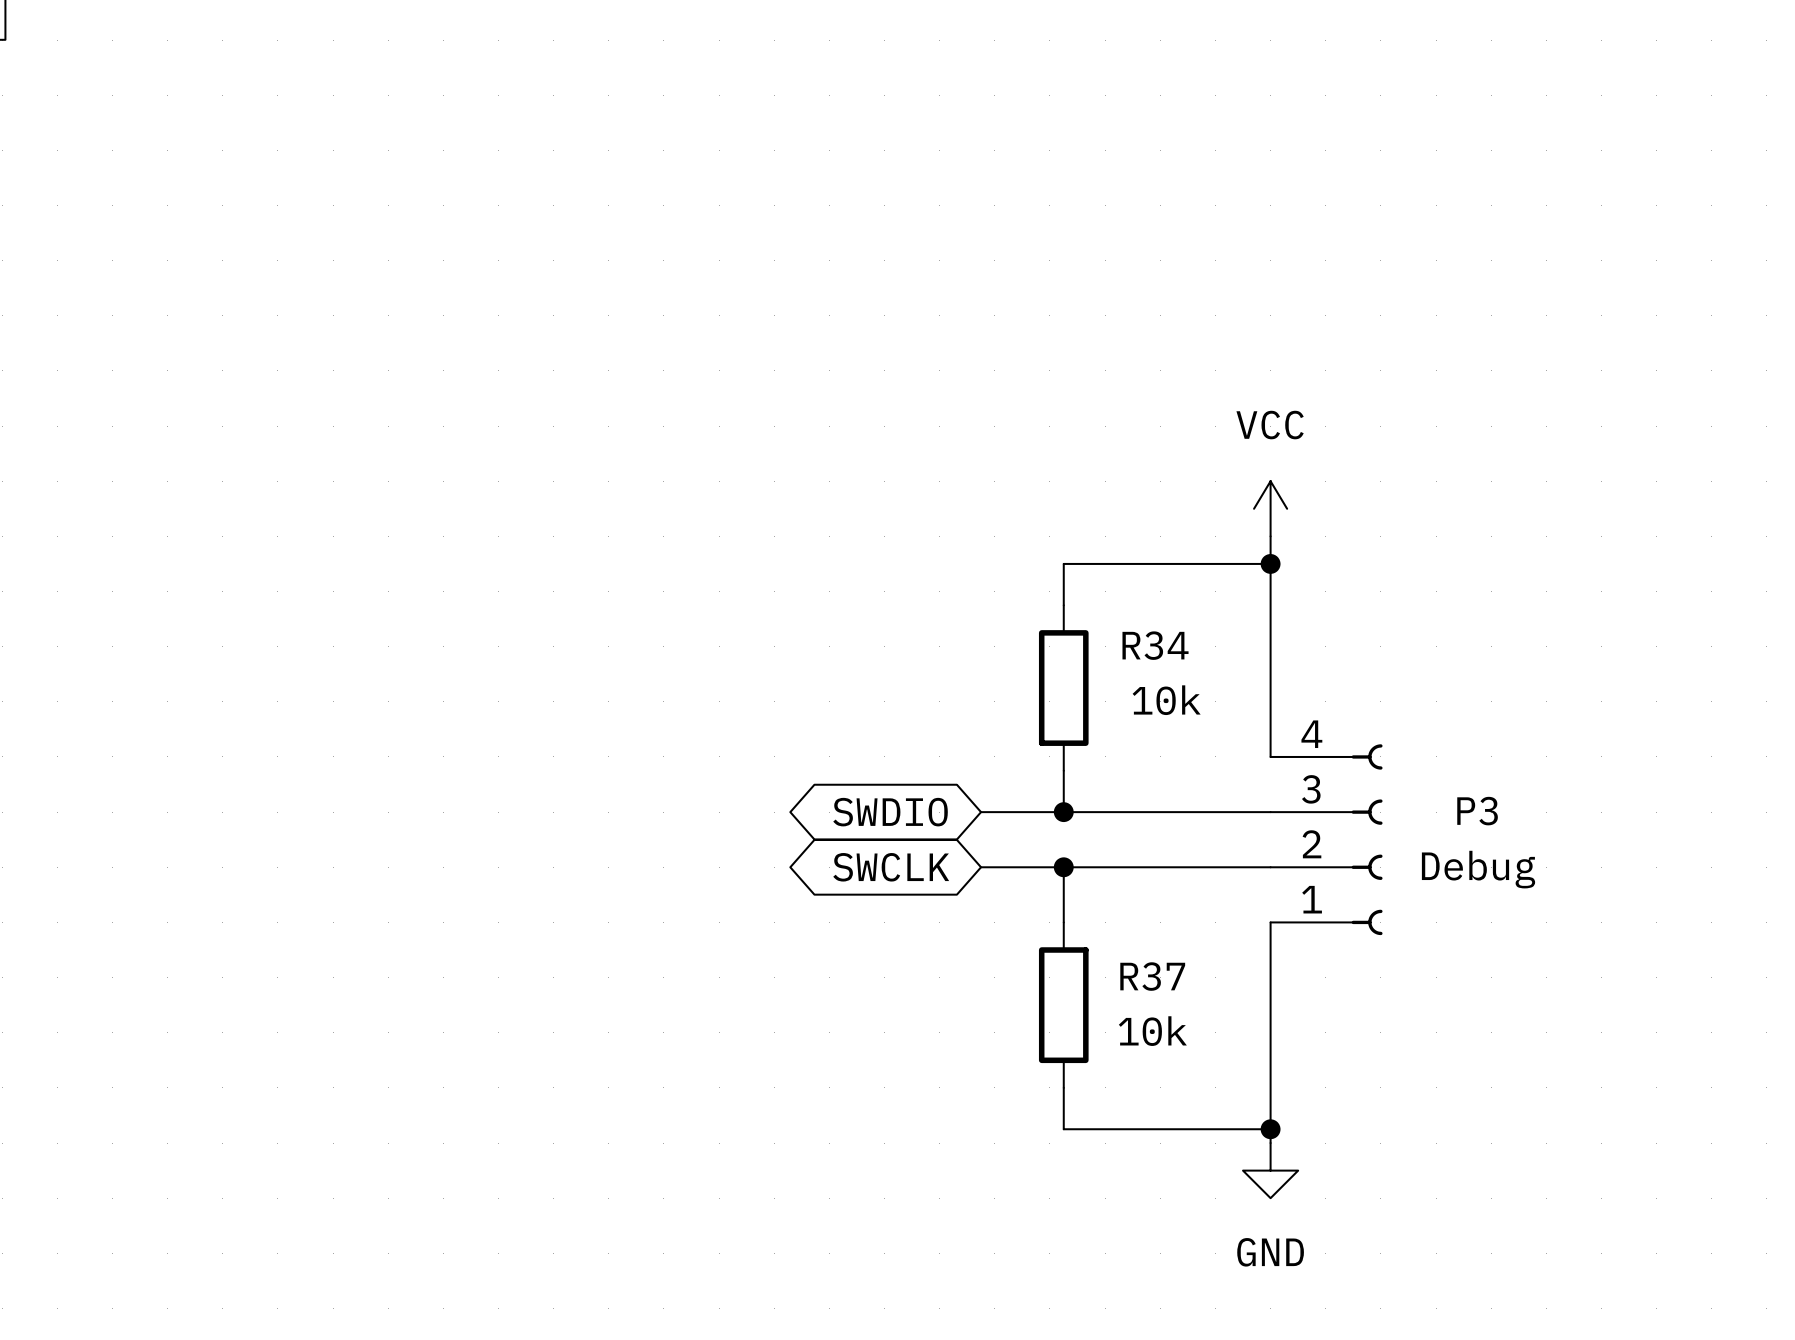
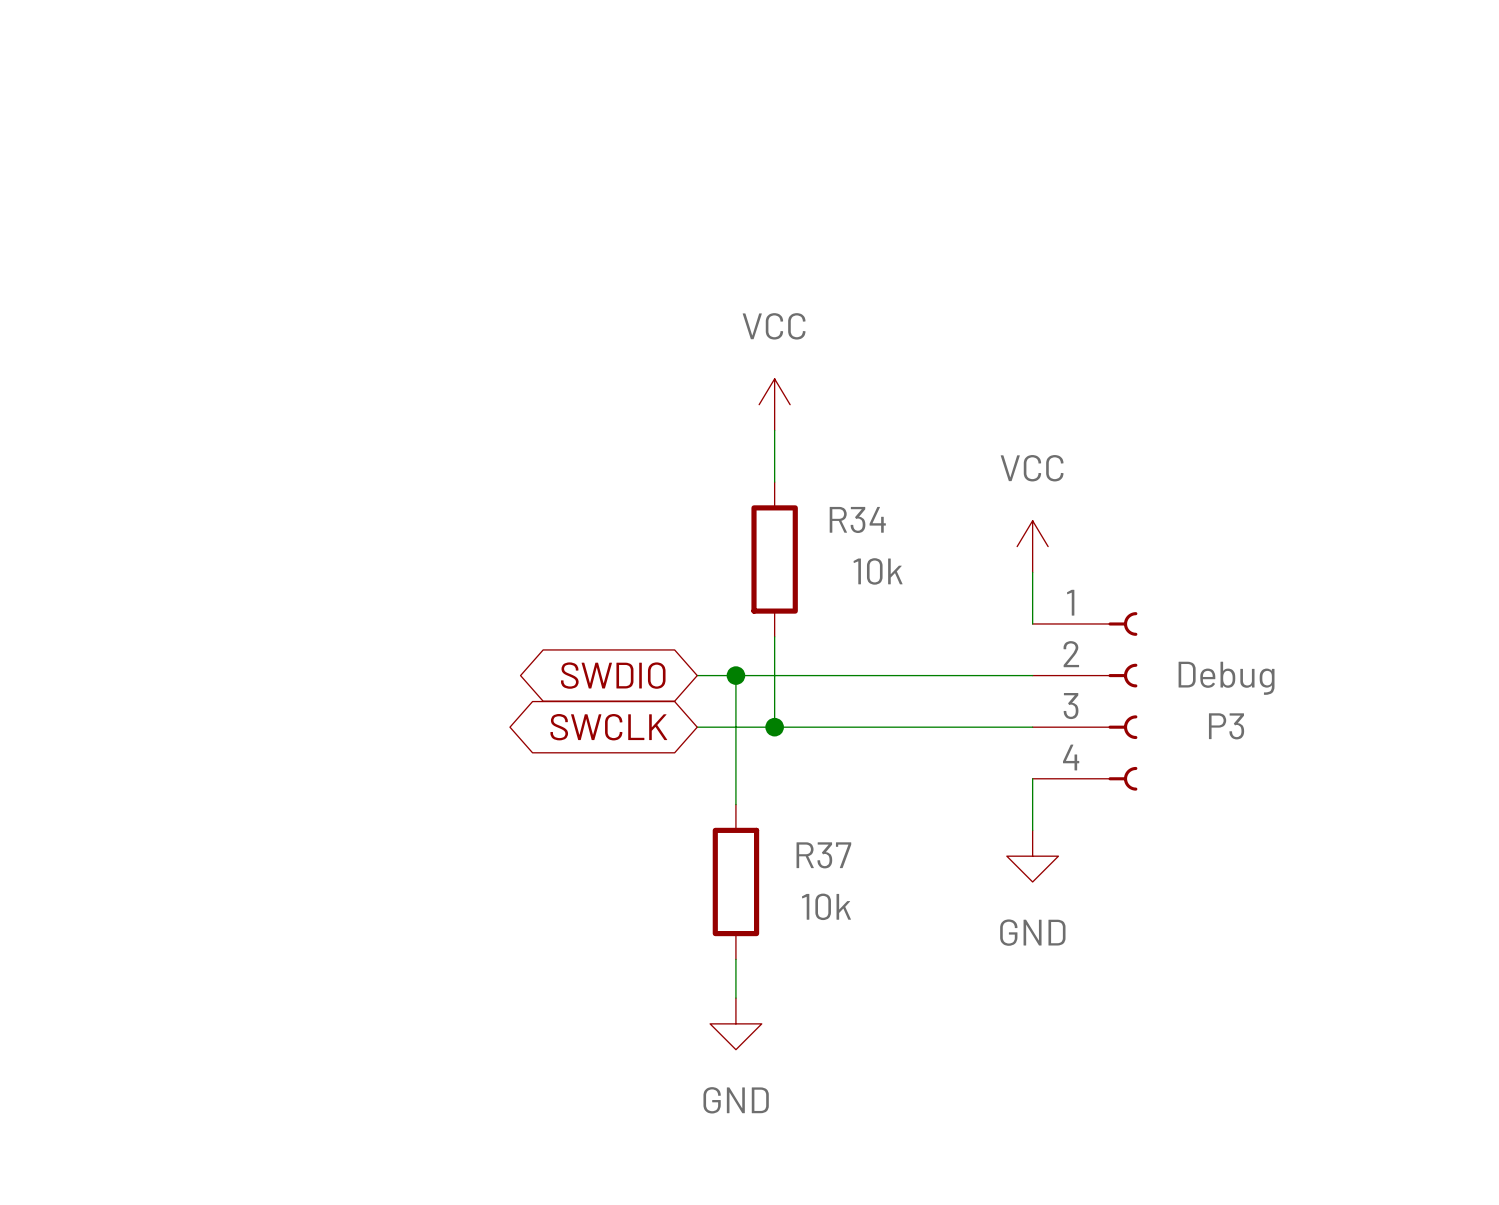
power symbol: VCC (1270, 508) -> none
power symbol: none -> VCC (774, 404)
wire: (1270, 536) (1270, 756) -> none
wire: (1063, 563) (1270, 563) -> (774, 443) (774, 430)
junction: (1270, 563) -> none
power symbol: none -> VCC (1032, 546)
wire: none -> (1032, 572) (1032, 623)
wire: none -> (735, 675) (735, 804)
junction position: (1063, 812) -> (735, 675)
P3 flip: as is (1367, 839) -> up-down (1122, 701)
wire: (1063, 867) (1063, 922) -> (774, 727) (774, 675)
wire: (1270, 922) (1270, 1143) -> none
wire: none -> (1032, 778) (1032, 830)
R37 position: (1063, 1005) -> (735, 881)
power symbol: none -> GND (1032, 856)
wire: (1063, 1087) (1063, 1129) (1270, 1129) -> none
wire: none -> (735, 959) (735, 998)
junction: (1270, 1129) -> none
power symbol: GND (1270, 1170) -> none
power symbol: none -> GND (735, 1023)

